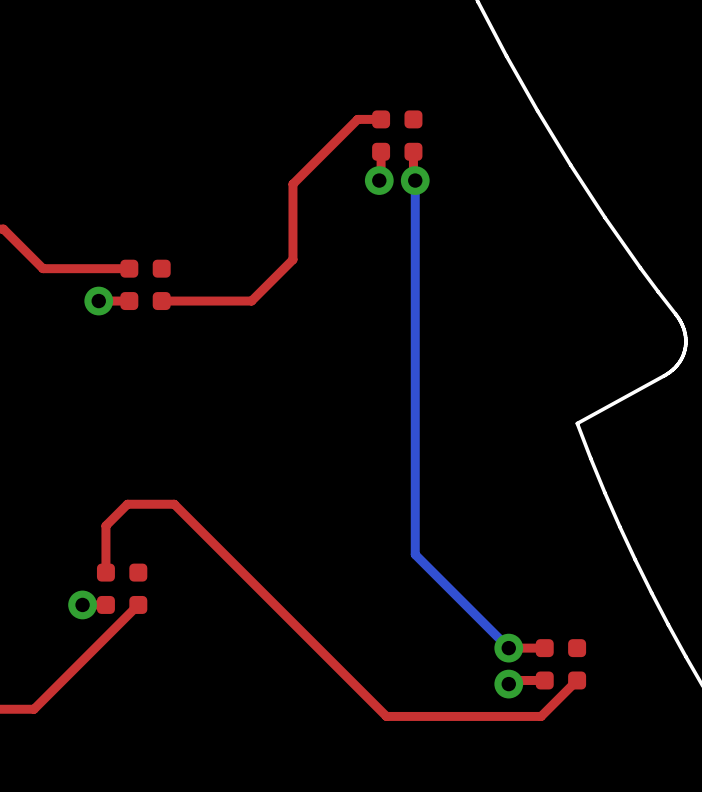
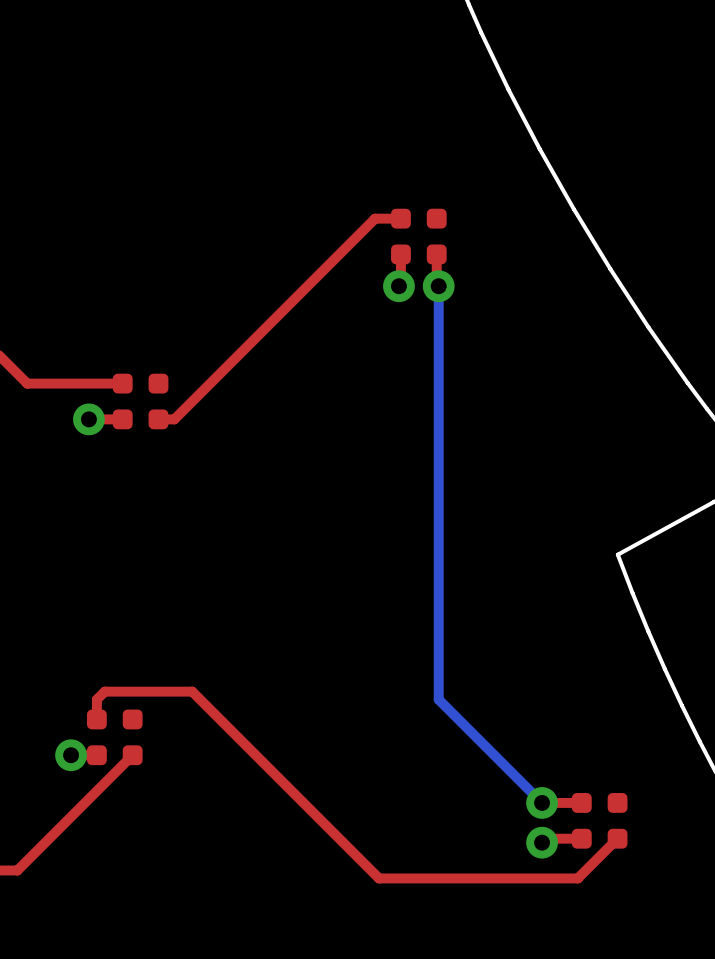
top track: (292, 184) (292, 259) (251, 301) (176, 301) -> (303, 290) (174, 419)
top track: (105, 554) (105, 525) (127, 504) (174, 504) (386, 716) -> (96, 699) (104, 691) (192, 691) (379, 878) (406, 878)

